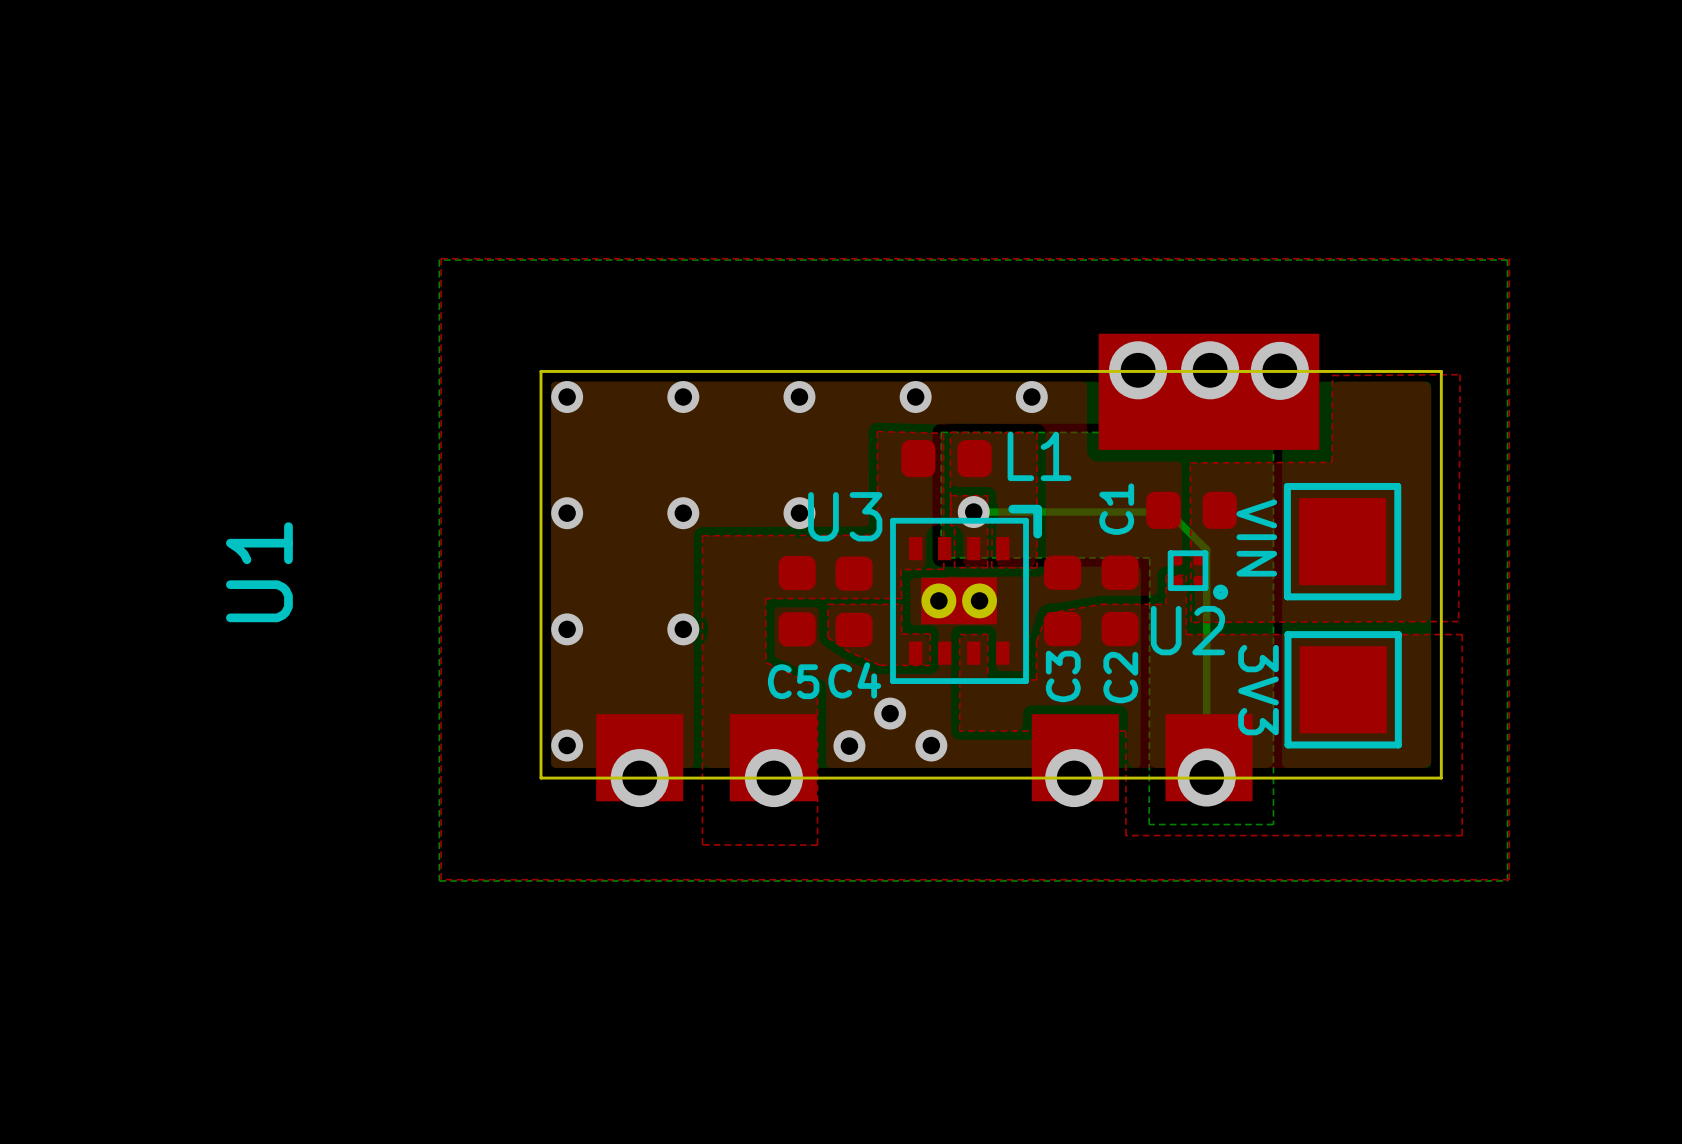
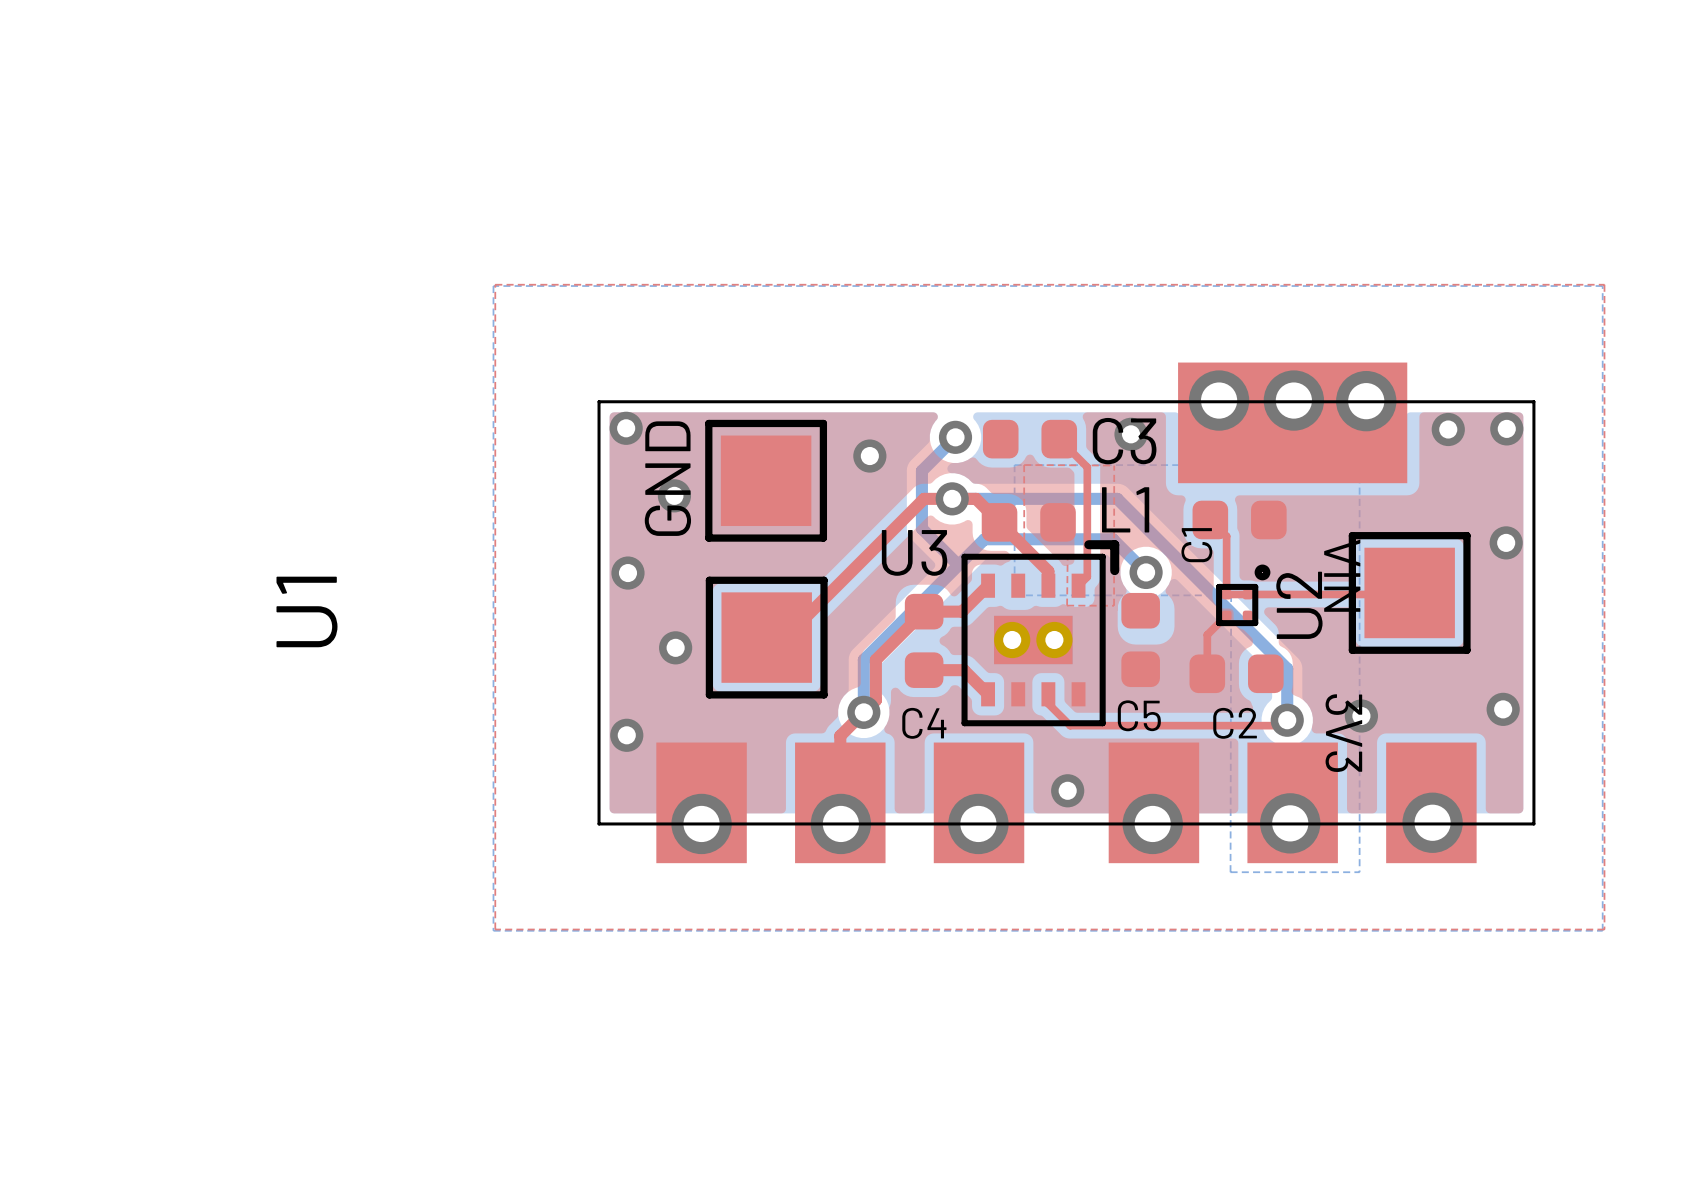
U3 footprint: [1031, 333, 1320, 802] -> [1108, 362, 1477, 864]
top zone outline: (1460, 374) (1332, 375) (1332, 462) (1190, 462) (1190, 622) (1458, 621) (1460, 374) -> none
via: (683, 397) -> none
via position: (799, 397) -> (869, 456)
via position: (915, 397) -> (955, 437)
via position: (1031, 397) -> (1131, 434)
via: none -> (1506, 428)
via: none -> (1448, 429)
bottom track: none -> (955, 437) (921, 470) (921, 528) (959, 564)
top track: none -> (1059, 439) (1087, 467) (1087, 576) (1078, 585)
top zone outline: (877, 431) (877, 535) (702, 535) (702, 844) (817, 845) (817, 687) (765, 662) (765, 598) (901, 598) (901, 569) (943, 569) (943, 433) (877, 431) -> none
text: none -> GND (667, 478)
part: none -> (766, 480)
L1 name position: L1 (1039, 456) -> L1 (1125, 509)
L1 position: (946, 458) -> (1029, 439)
via: none -> (674, 495)
bottom track: none -> (952, 498) (1117, 498) (1287, 668) (1287, 720)
via: none -> (952, 498)
top track: none -> (1210, 519) (1226, 536) (1226, 594) (1409, 592)
C3: none -> (1028, 522)
top zone outline: (951, 495) (951, 525) (954, 525) (954, 567) (987, 567) (987, 495) (951, 495) -> none
via: none -> (1506, 542)
C1 position: (1191, 510) -> (1239, 519)
bottom track: (973, 512) (1168, 512) (1206, 549) (1206, 761) -> none
via: (973, 512) -> none
via position: (567, 513) -> (627, 573)
via: (683, 513) -> none
via: (799, 513) -> none
bottom track: none -> (1146, 572) (1112, 539) (984, 539) (863, 659) (863, 712)
via: none -> (1146, 572)
part position: (1342, 541) -> (1409, 592)
top track: none -> (988, 585) (962, 611) (924, 611) (875, 659) (875, 700) (840, 735) (840, 802)
top track: none -> (1048, 585) (1048, 571) (976, 498) (924, 498) (785, 637) (766, 637)
U2 position: (1188, 570) -> (1237, 605)
top zone outline: (1166, 575) (1166, 604) (1101, 604) (1046, 613) (1036, 642) (1036, 679) (987, 679) (987, 634) (959, 634) (959, 731) (1125, 731) (1125, 835) (1462, 835) (1462, 634) (1186, 634) (1186, 575) (1166, 575) -> none
top track: none -> (1226, 615) (1207, 634) (1207, 673)
drawing position: (1220, 592) -> (1262, 572)
part: none -> (766, 637)
C2 rotation: 0° (1120, 600) -> 90° clockwise (1236, 673)
C5: (797, 601) -> none
top zone outline: (827, 604) (827, 637) (850, 652) (880, 665) (930, 665) (930, 634) (901, 634) (901, 604) (827, 604) -> none
via: none -> (675, 647)
via: (567, 629) -> none
via: (683, 629) -> none
top track: none -> (924, 670) (963, 670) (988, 694)
U2 name rotation: 0° (1187, 630) -> 90° counterclockwise (1299, 605)
top track: none -> (1048, 694) (1048, 703) (1070, 725) (1292, 725)
via: none -> (1503, 709)
via: none -> (863, 712)
via: none -> (1361, 716)
C3 name: C3 (1063, 676) -> C5 (1139, 715)
via: none -> (1287, 720)
part: (1343, 689) -> none
via: none -> (626, 735)
via: (890, 713) -> none
U1 footprint: [596, 714, 817, 802] -> [656, 742, 1025, 864]
via size: [915, 729, 948, 762] -> [948, 793, 1009, 855]
via: (567, 745) -> none
via: (849, 746) -> none
via: none -> (1067, 790)
via: none -> (1432, 822)

